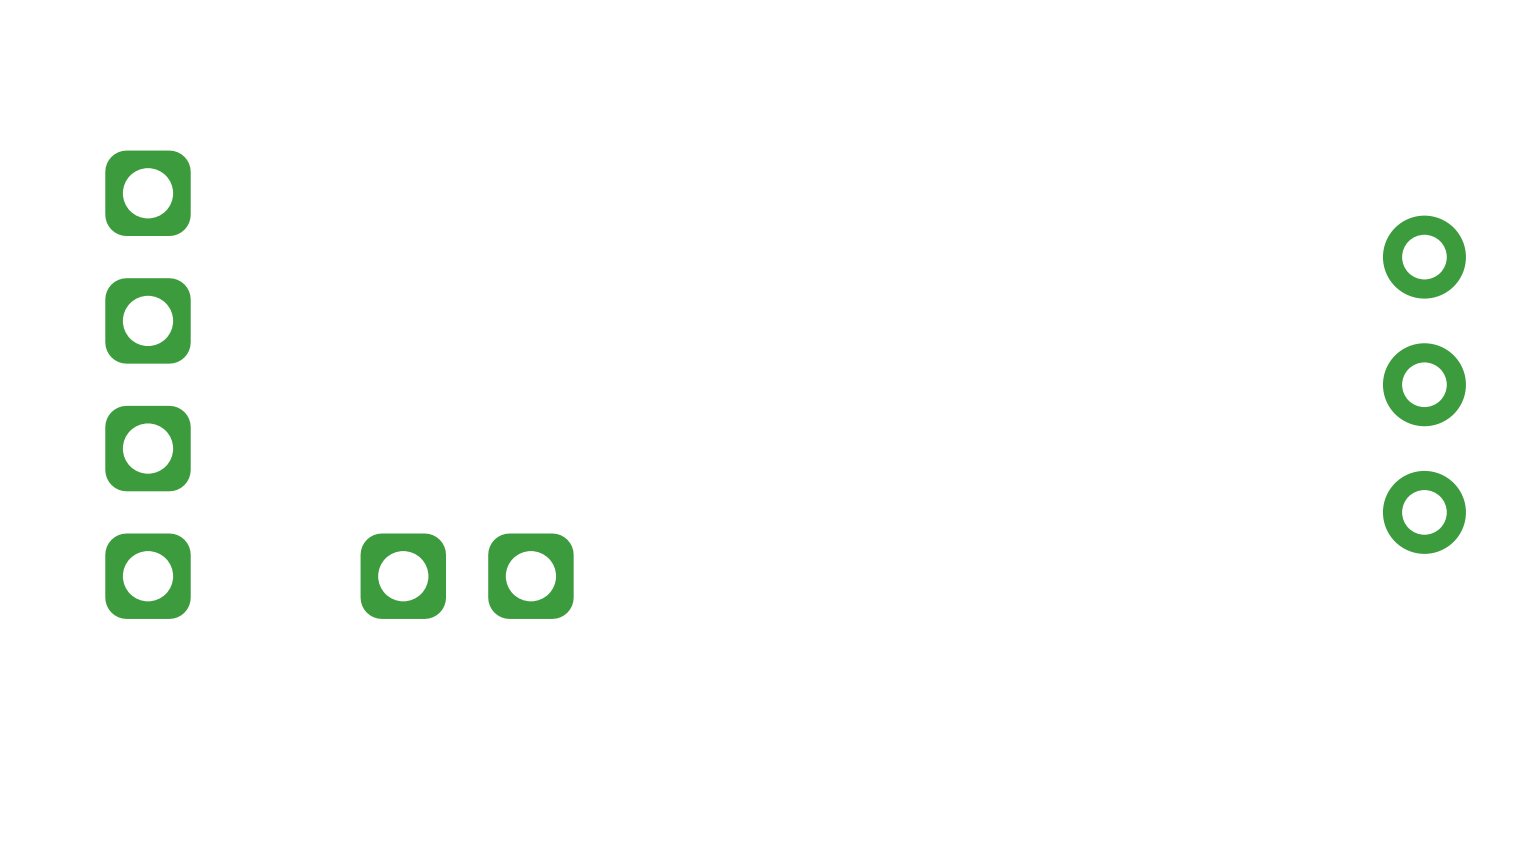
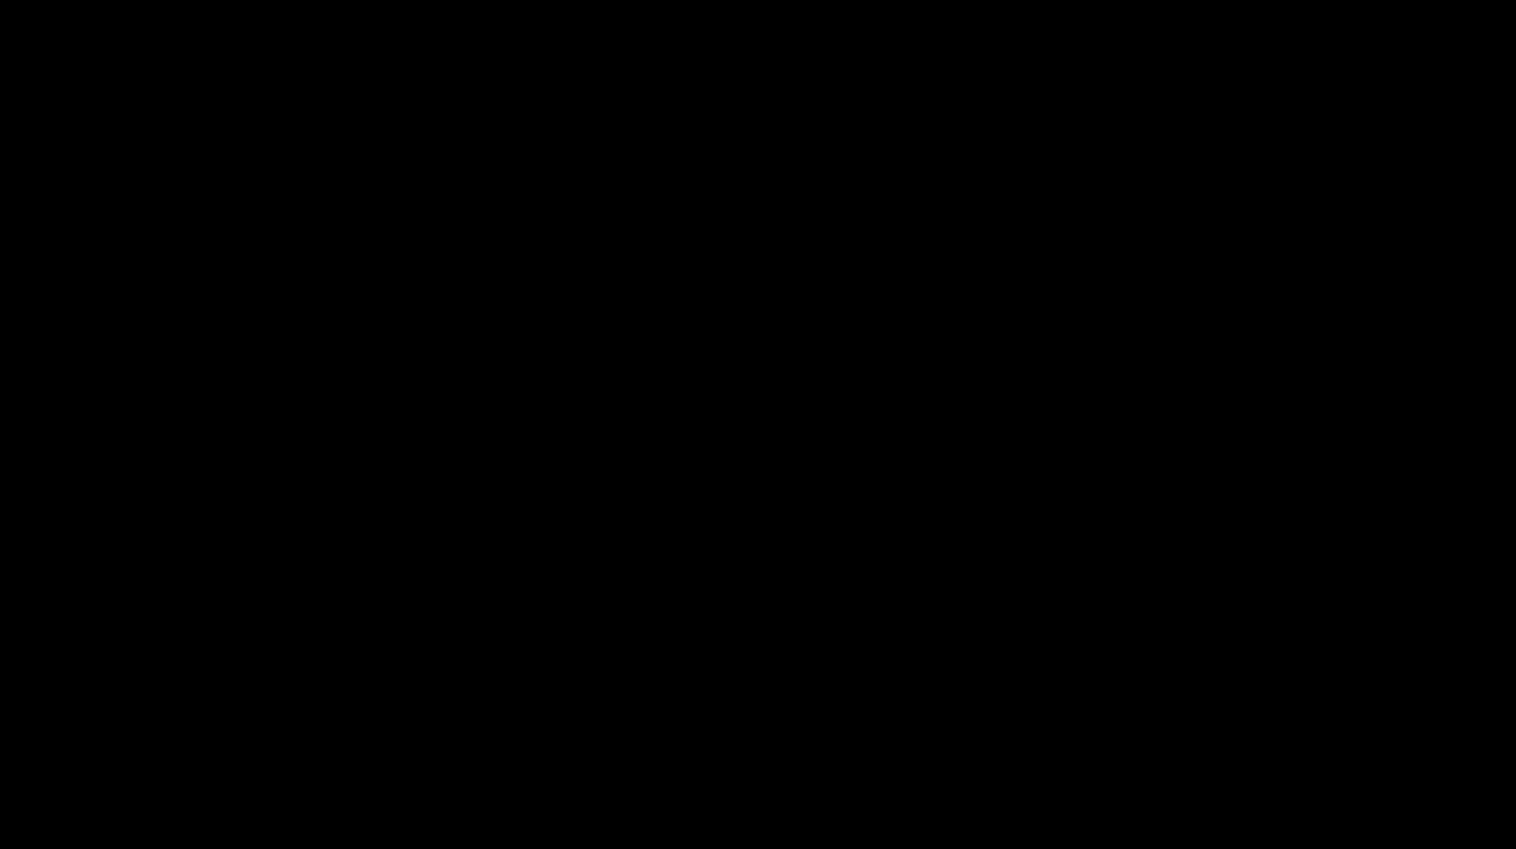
part: (148, 257) -> none
part: (1424, 384) -> none
part: (148, 512) -> none
part: (467, 576) -> none

